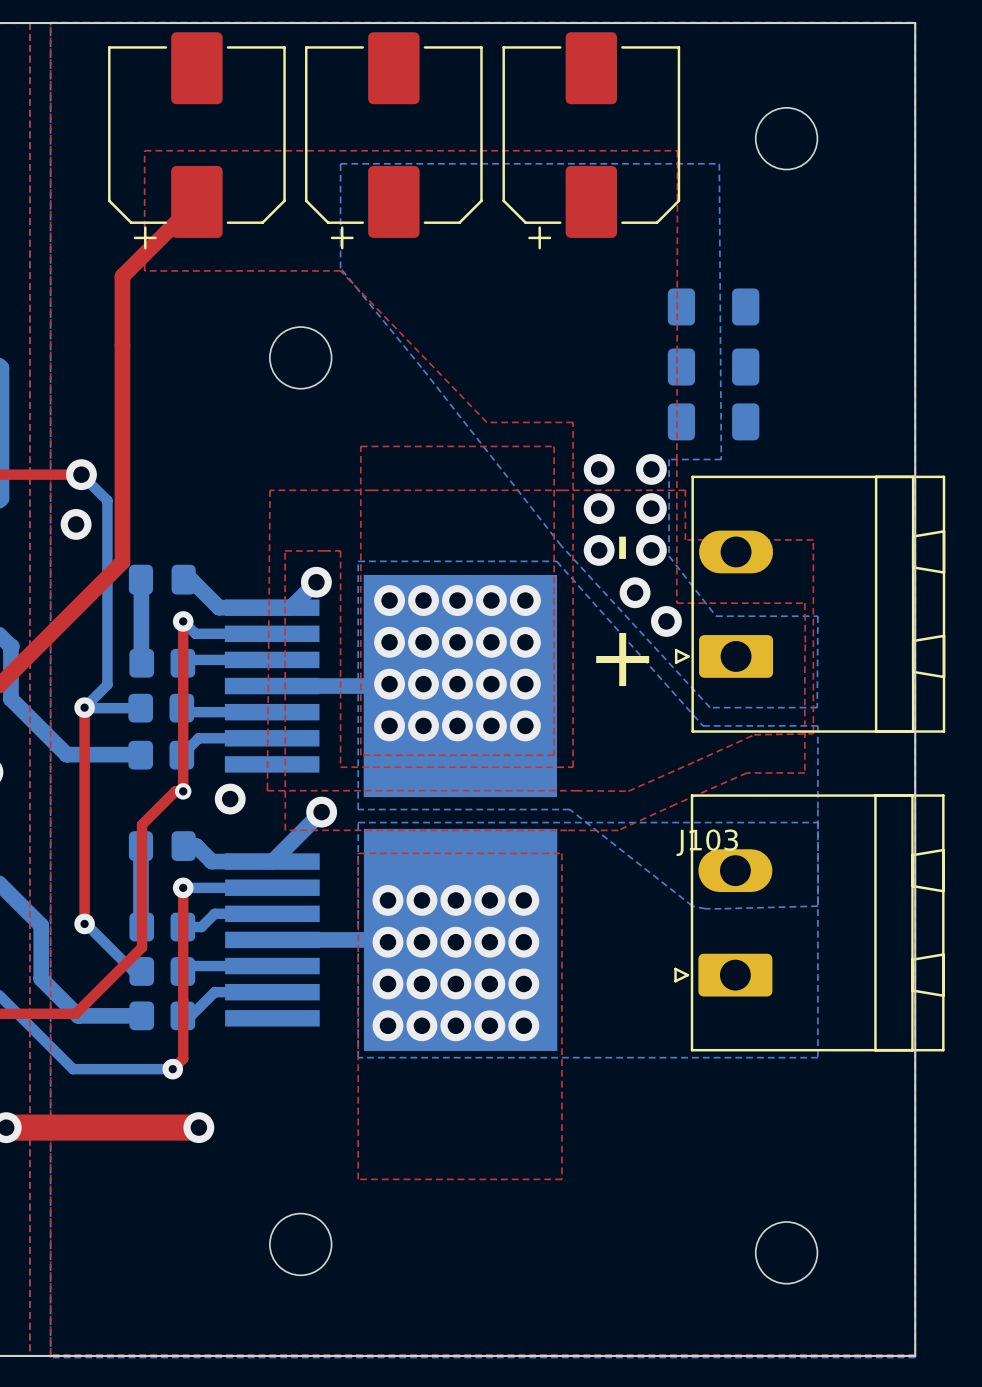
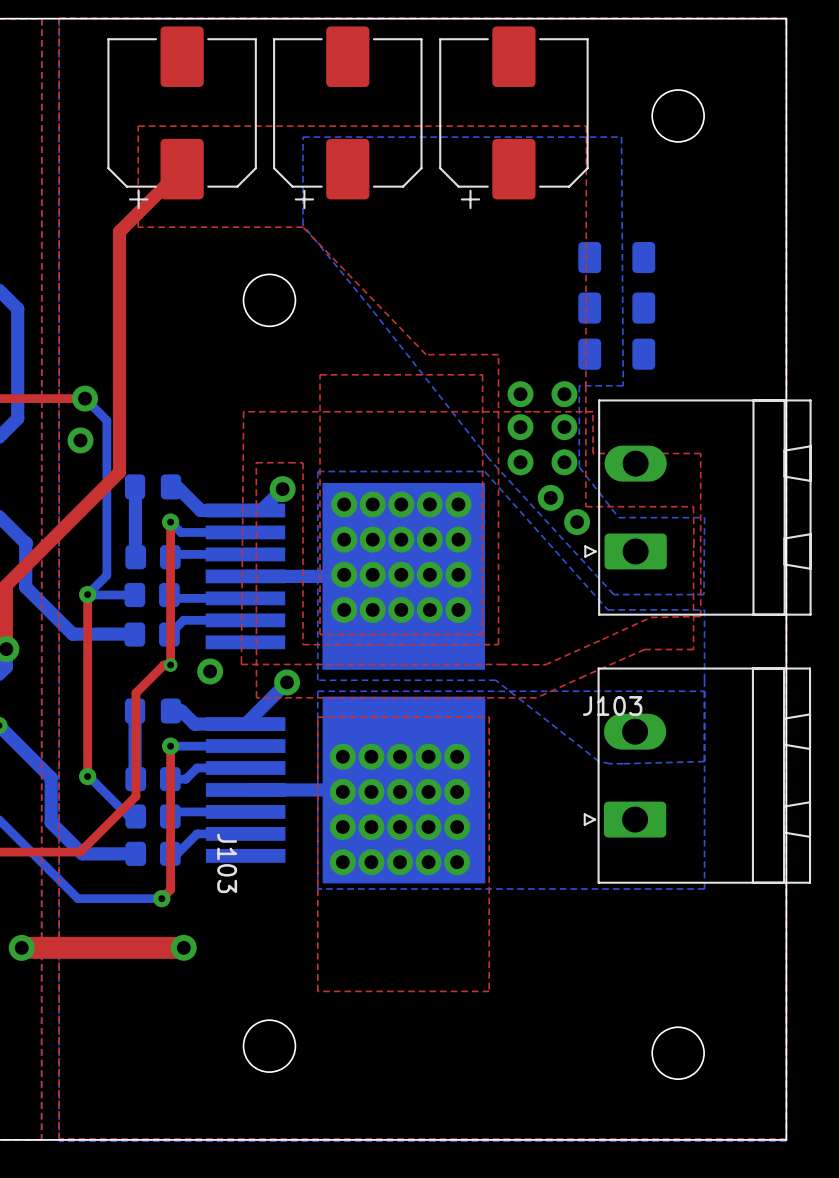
text: - (622, 547) -> none
text: + (622, 659) -> none
text: none -> J103 (227, 863)

